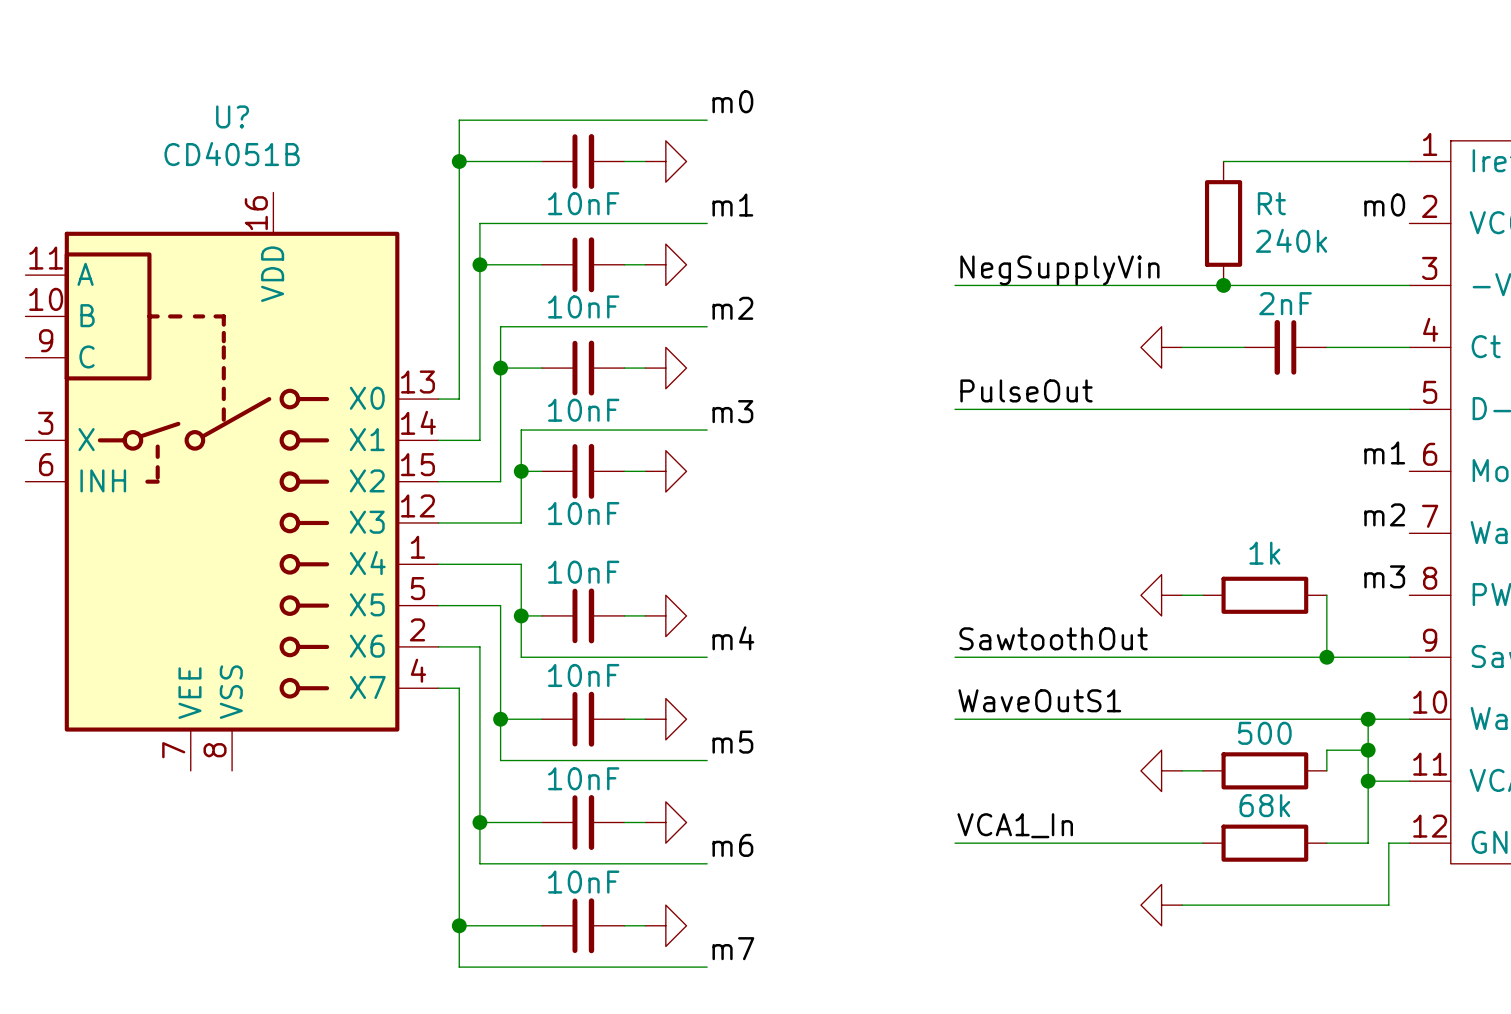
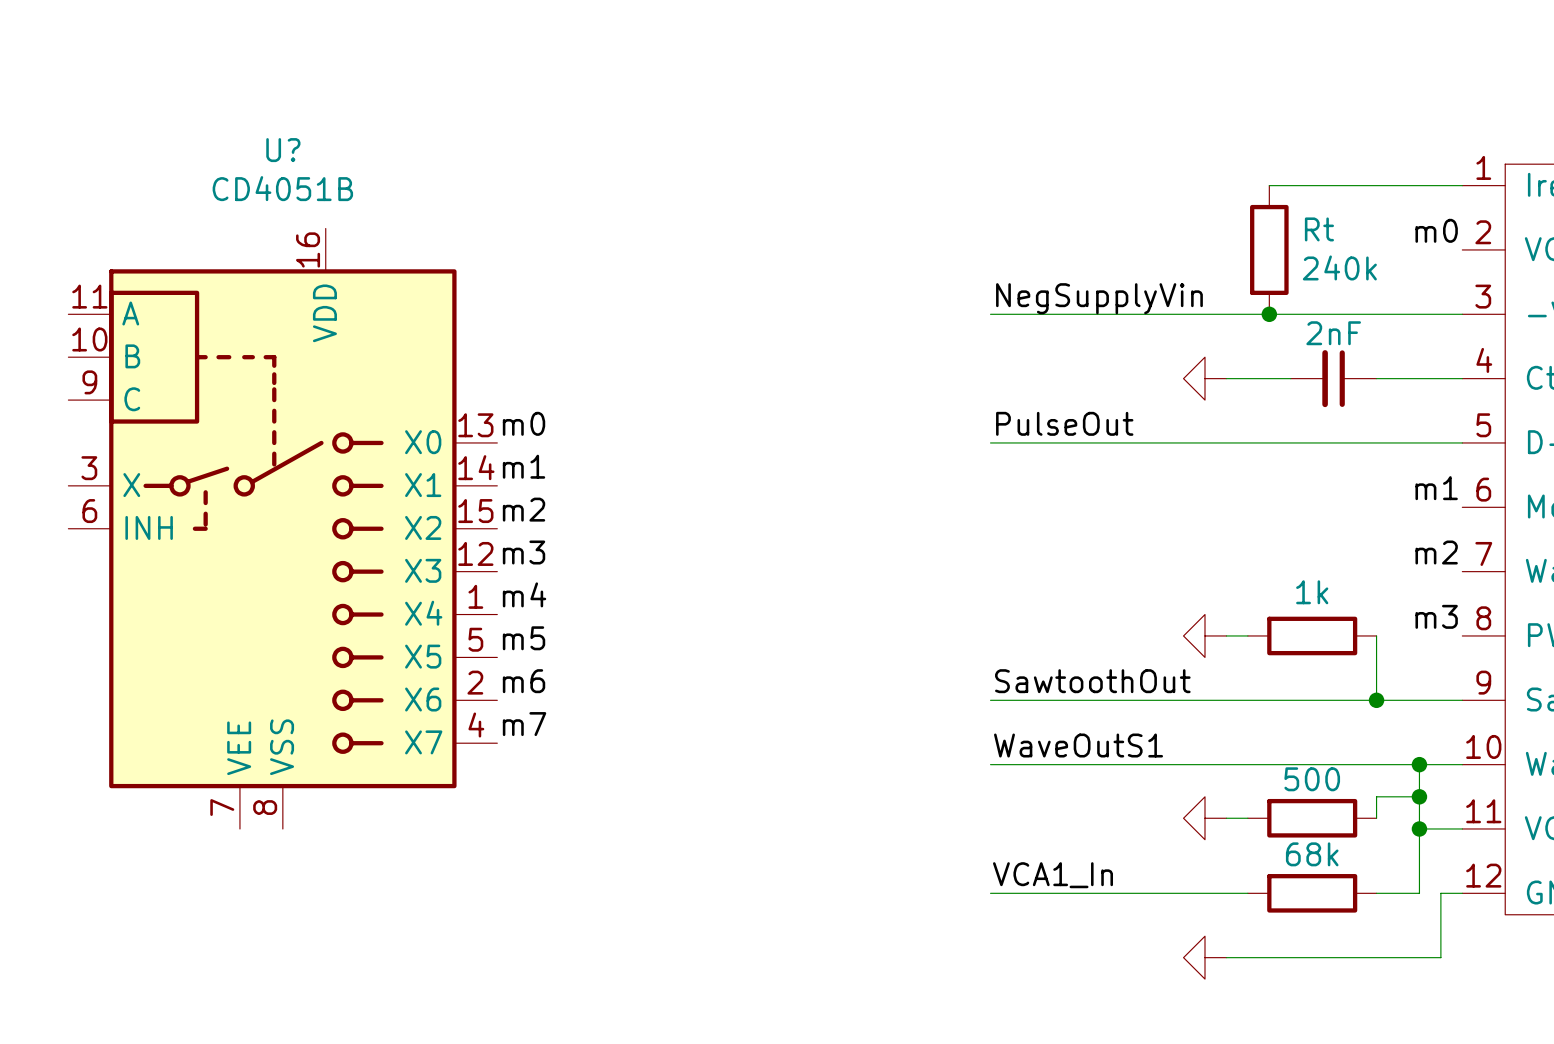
label position: m0 (732, 101) -> m0 (524, 423)
wire: (707, 120) (459, 120) (459, 399) (438, 399) -> none
wire: (459, 161) (541, 161) -> none
junction: (459, 161) -> none
part: 10nF (583, 161) -> none
wire: (624, 161) (645, 161) -> none
power symbol: (665, 161) -> none
label position: m1 (732, 205) -> m1 (524, 466)
wire: (707, 223) (479, 223) (479, 440) (438, 440) -> none
wire: (479, 264) (541, 264) -> none
junction: (479, 264) -> none
part: 10nF (583, 264) -> none
wire: (624, 264) (645, 264) -> none
power symbol: (665, 264) -> none
label position: m2 (732, 308) -> m2 (524, 509)
wire: (707, 326) (500, 326) (500, 481) (438, 481) -> none
wire: (500, 368) (541, 368) -> none
junction: (500, 368) -> none
part: 10nF (583, 368) -> none
wire: (624, 368) (645, 368) -> none
power symbol: (665, 368) -> none
label position: m3 (732, 411) -> m3 (524, 552)
wire: (707, 430) (521, 430) (521, 522) (438, 522) -> none
wire: (521, 471) (541, 471) -> none
junction: (521, 471) -> none
part: 10nF (583, 471) -> none
wire: (624, 471) (645, 471) -> none
power symbol: (665, 471) -> none
U? position: (232, 481) -> (282, 528)
wire: (438, 564) (521, 564) (521, 657) (707, 657) -> none
wire: (438, 605) (500, 605) (500, 760) (707, 760) -> none
wire: (521, 615) (541, 615) -> none
junction: (521, 615) -> none
part: 10nF (583, 615) -> none
wire: (624, 615) (645, 615) -> none
power symbol: (665, 615) -> none
label position: m4 (733, 638) -> m4 (524, 594)
wire: (438, 646) (479, 646) (479, 863) (707, 863) -> none
wire: (438, 688) (459, 688) (459, 967) (707, 967) -> none
wire: (500, 719) (541, 719) -> none
junction: (500, 719) -> none
part: 10nF (583, 719) -> none
wire: (624, 719) (645, 719) -> none
power symbol: (665, 719) -> none
label position: m5 (732, 742) -> m5 (524, 638)
wire: (479, 822) (541, 822) -> none
junction: (479, 822) -> none
part: 10nF (583, 822) -> none
wire: (624, 822) (645, 822) -> none
power symbol: (665, 822) -> none
label position: m6 (732, 845) -> m6 (524, 681)
wire: (459, 925) (541, 925) -> none
junction: (459, 925) -> none
part: 10nF (583, 925) -> none
wire: (624, 925) (645, 925) -> none
power symbol: (665, 925) -> none
label position: m7 (733, 948) -> m7 (524, 724)

